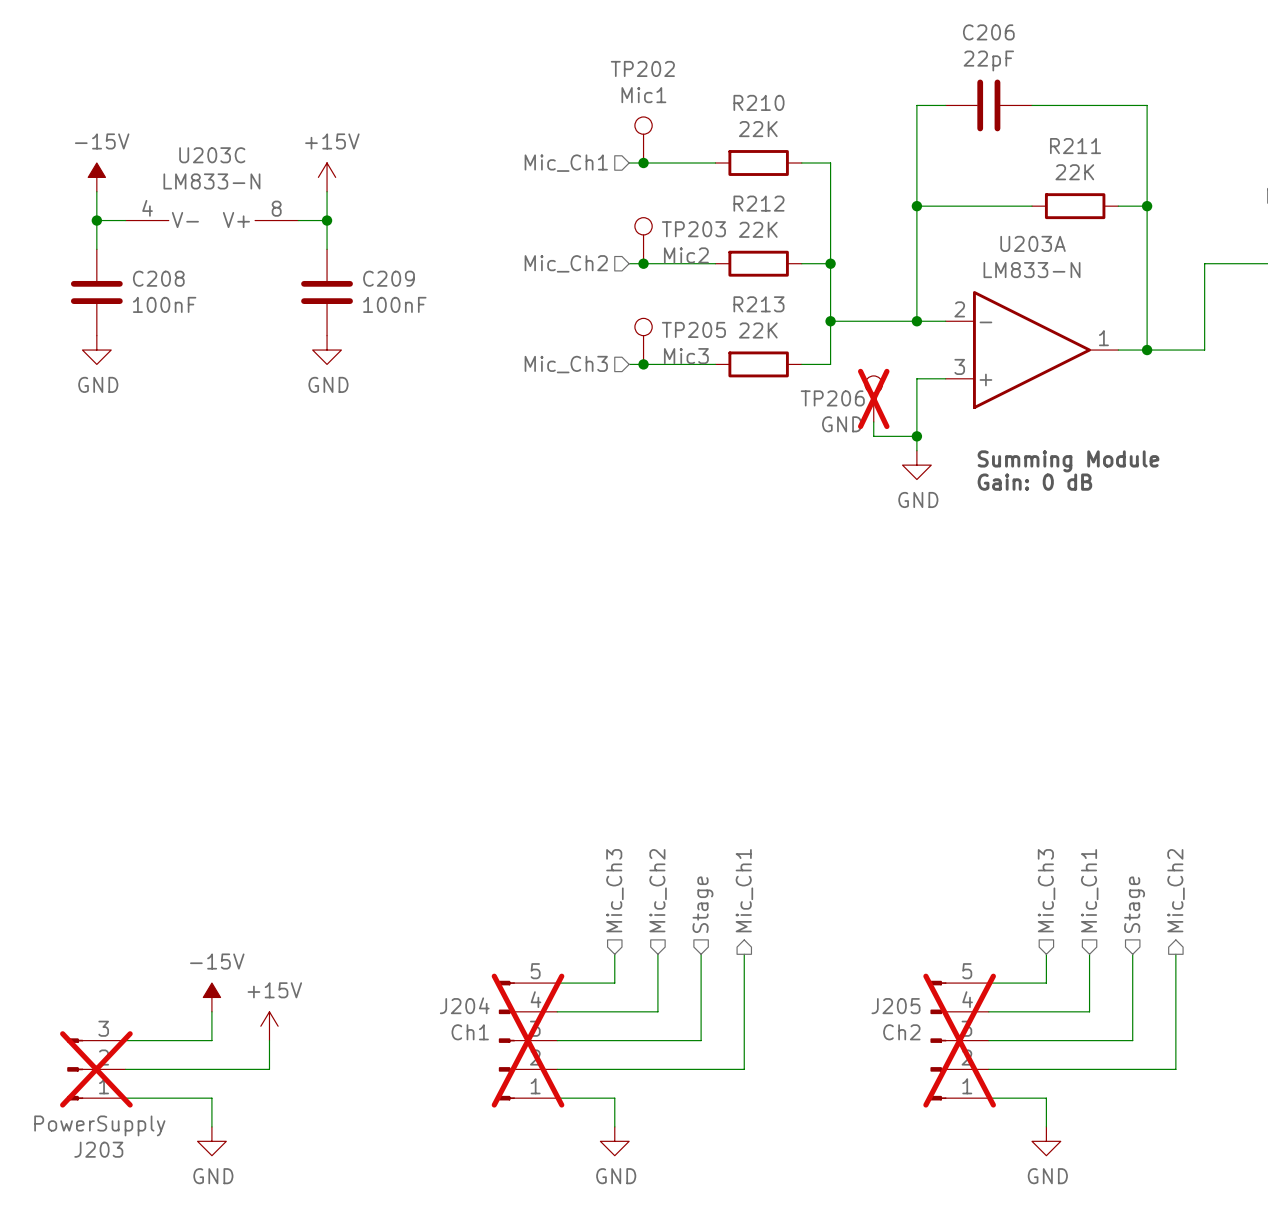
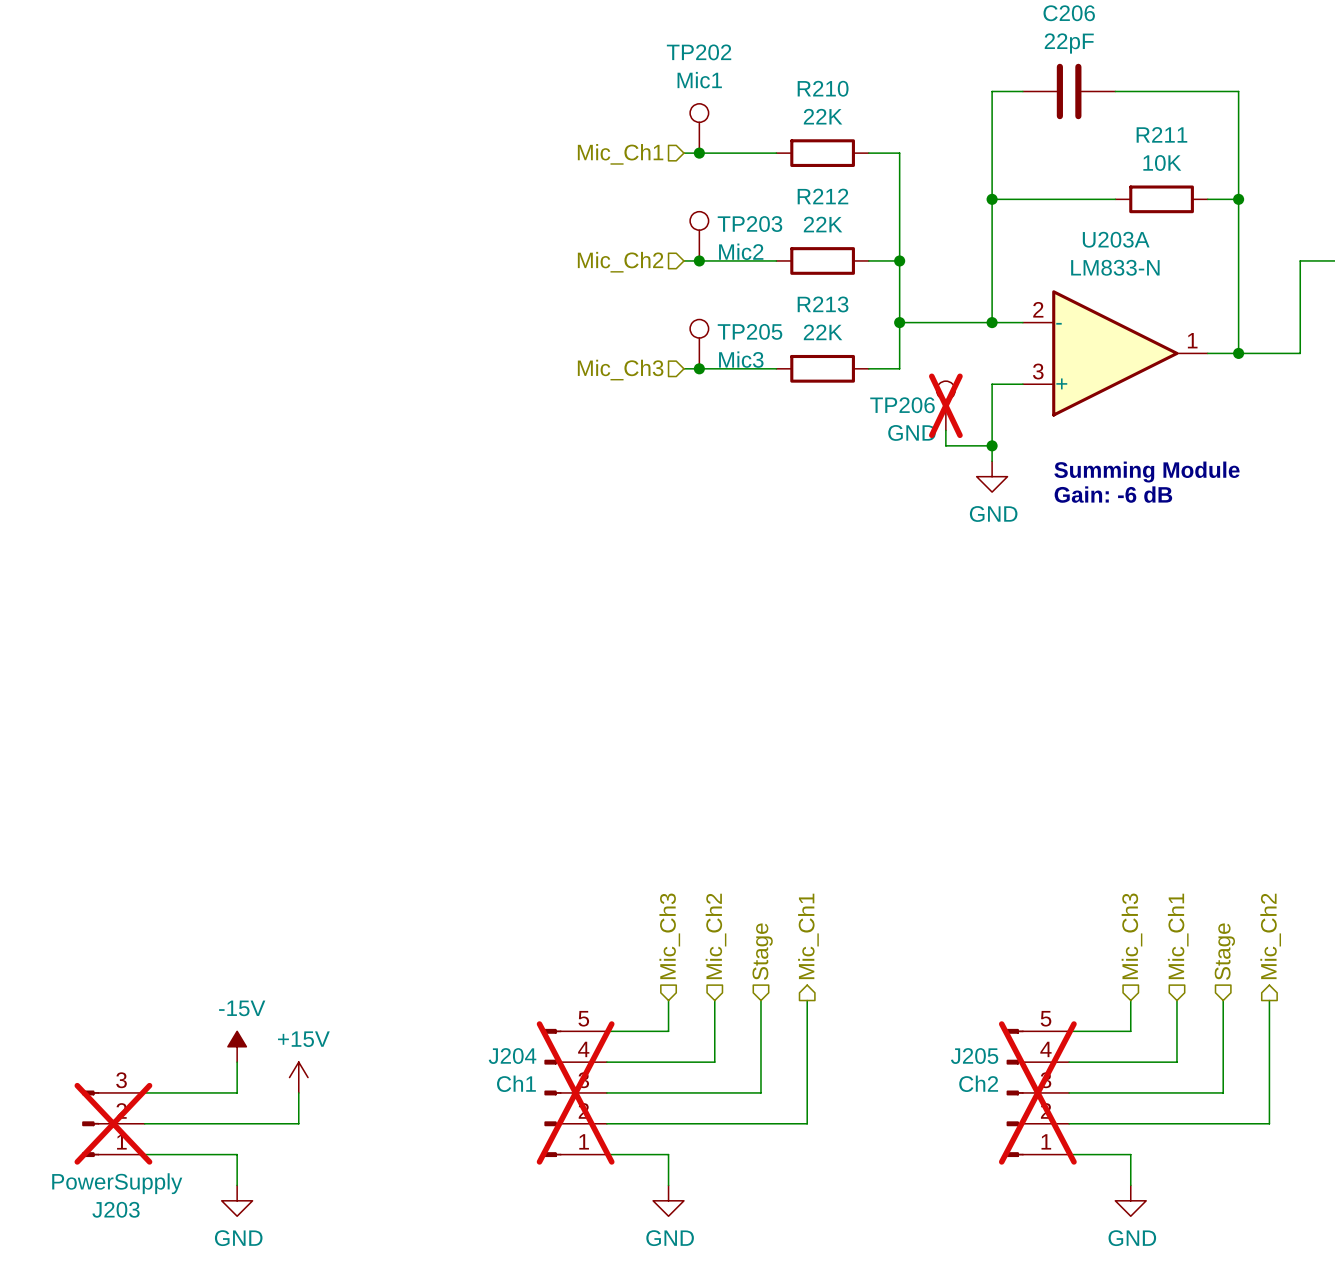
R211 value: 22K (1074, 172) -> 10K (1162, 163)
power symbol: -15V (96, 177) -> none
power symbol: +15V (327, 177) -> none
wire: (96, 191) (96, 249) -> none
wire: (327, 191) (327, 249) -> none
wire: (96, 220) (125, 220) -> none
junction: (96, 220) -> none
U203C: LM833-N (211, 220) -> none
wire: (298, 220) (327, 220) -> none
junction: (327, 220) -> none
C208: 100nF (96, 292) -> none
C209: 100nF (327, 292) -> none
power symbol: GND (96, 350) -> none
power symbol: GND (327, 350) -> none
text: Gain: 0 dB (1034, 482) -> Gain: -6 dB (1113, 494)

